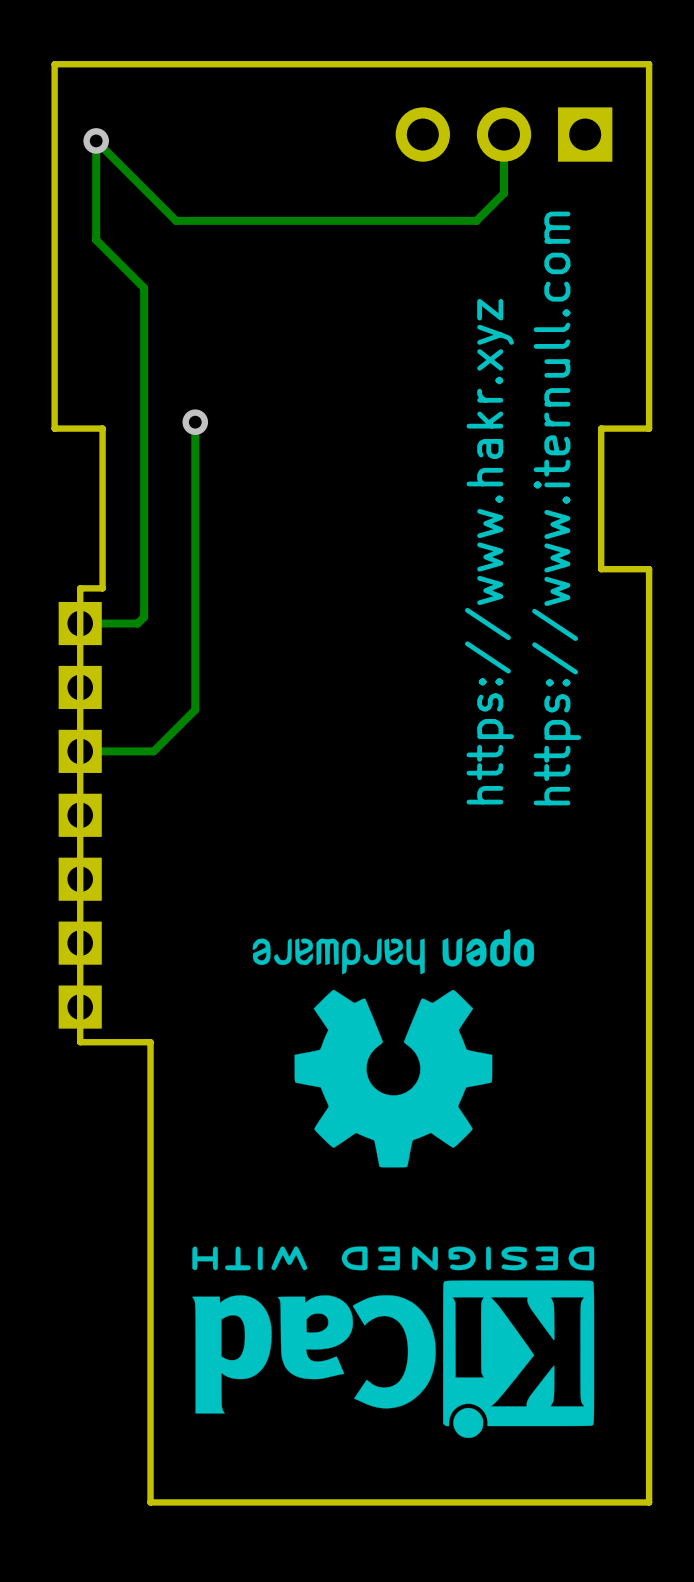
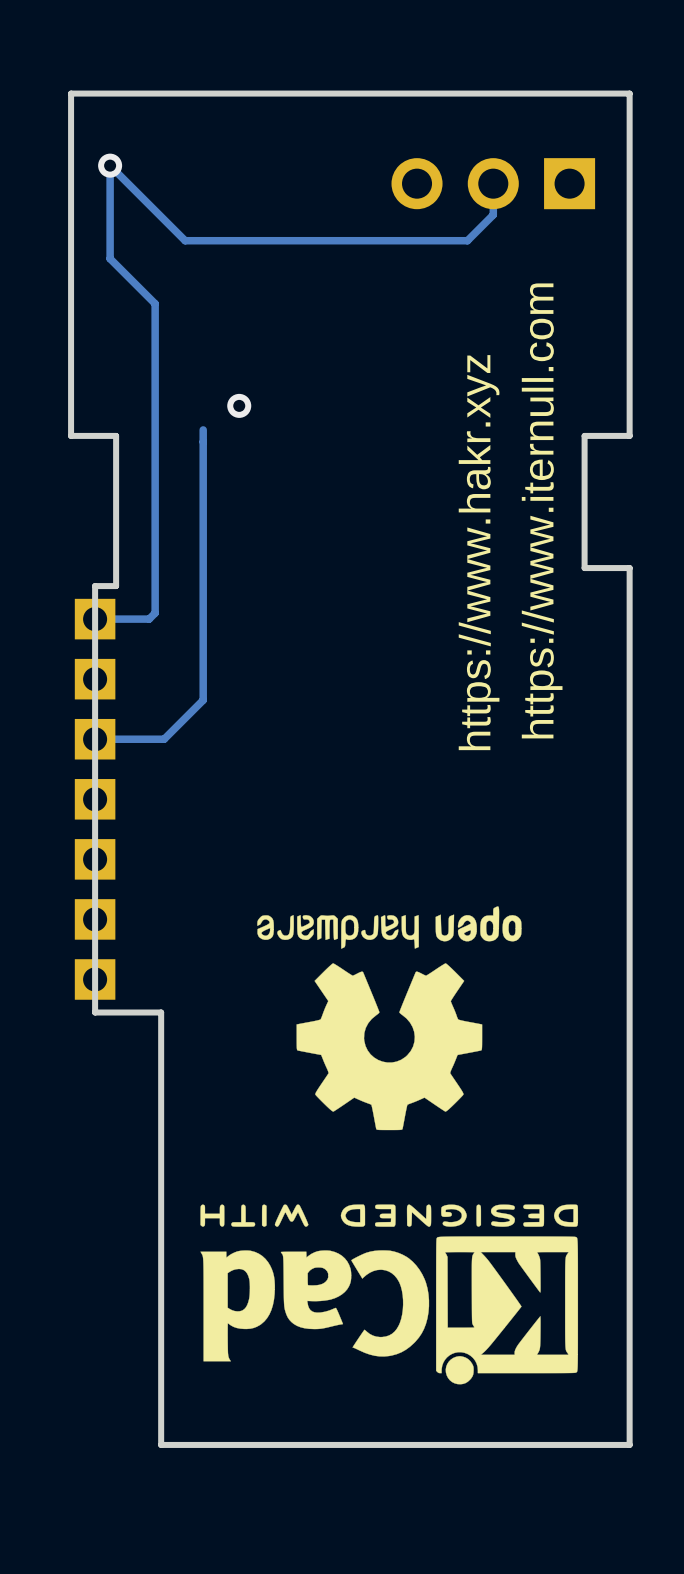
part position: (504, 134) -> (493, 183)
via position: (195, 422) -> (239, 405)

